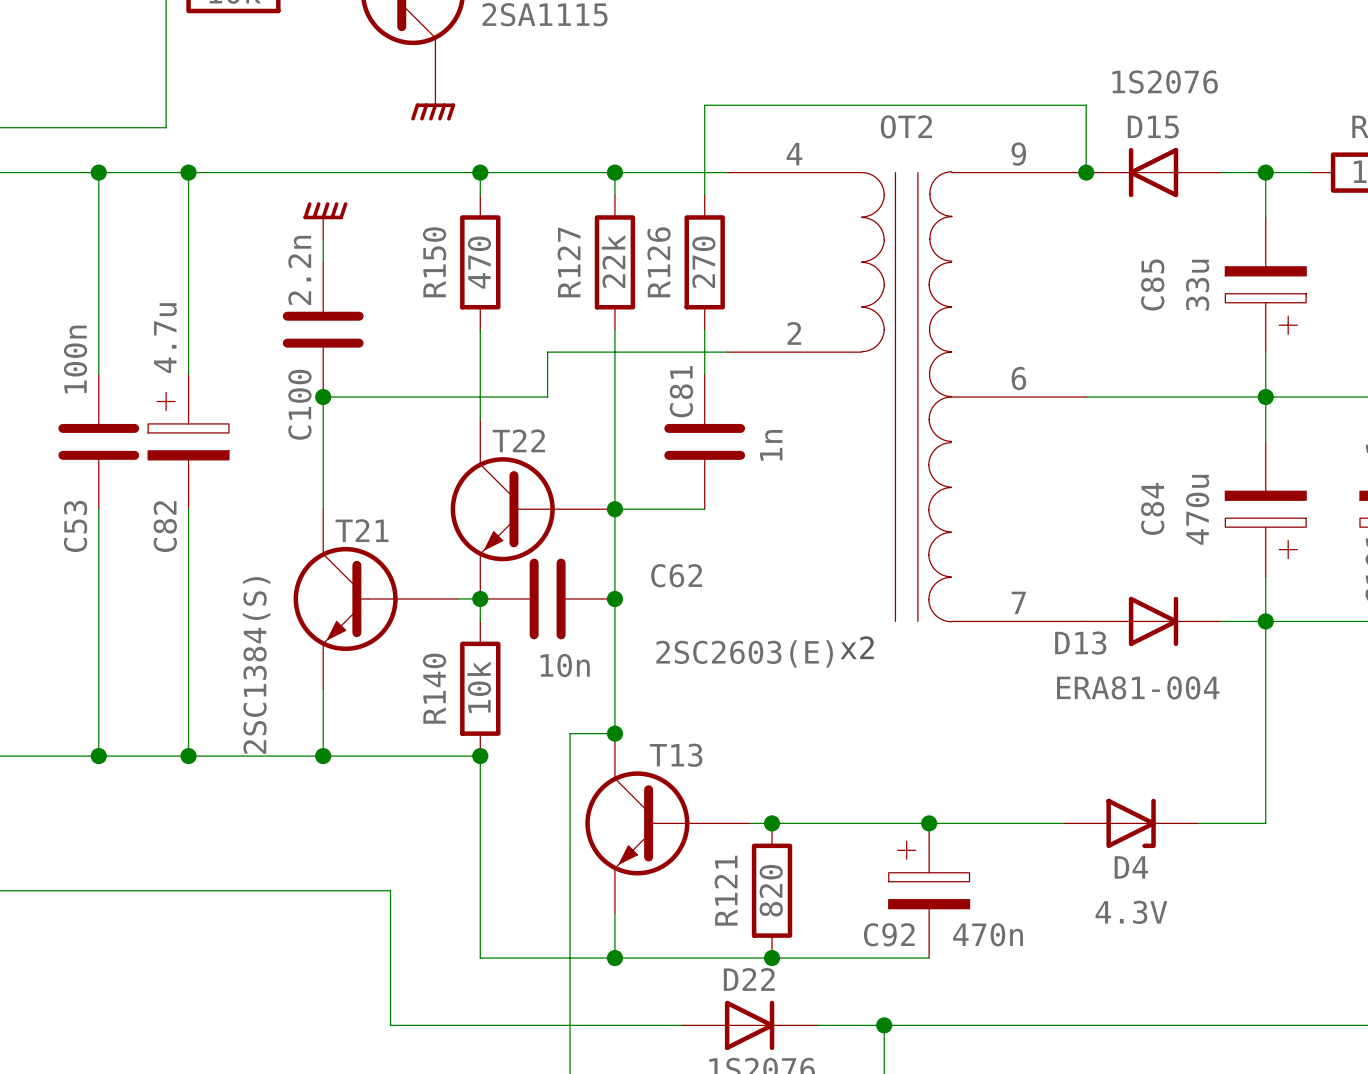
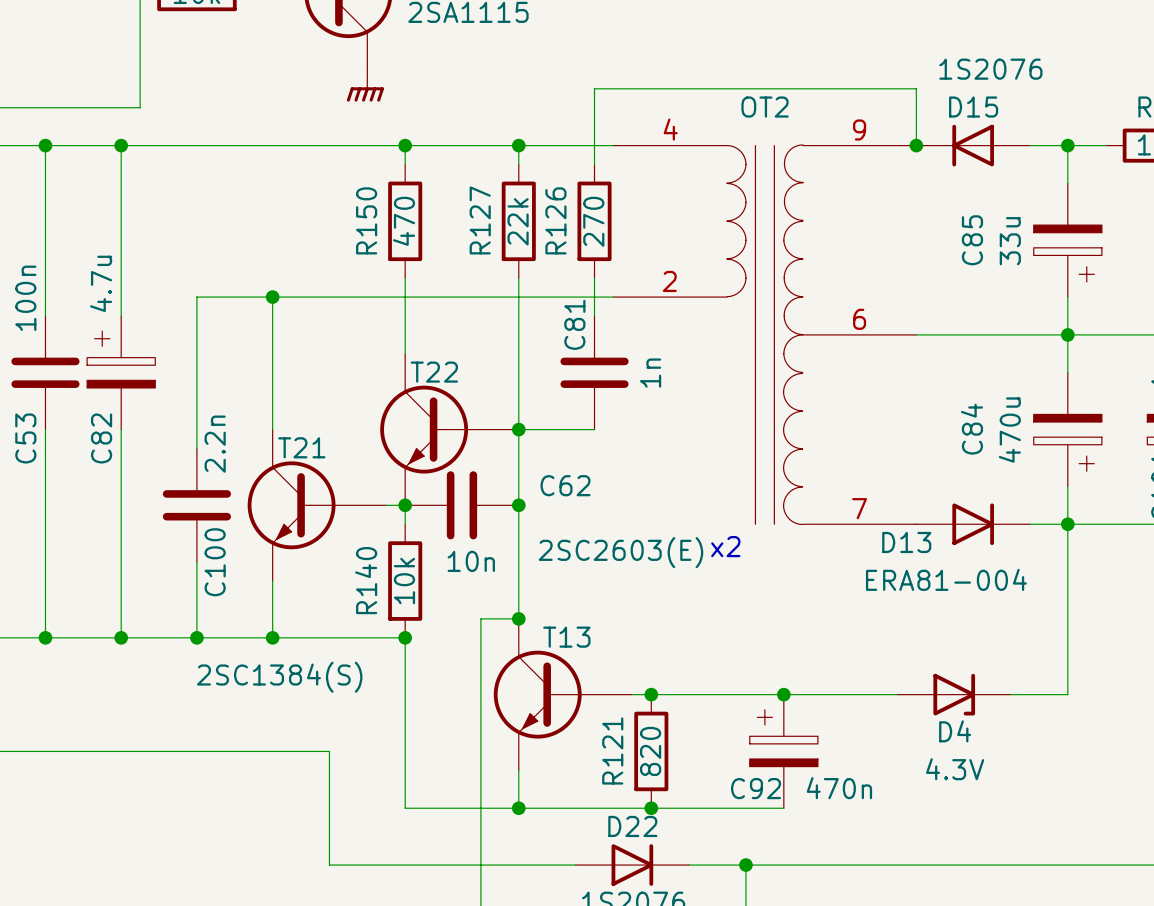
junction: none -> (45, 145)
wire: (98, 172) (98, 374) -> (45, 145) (45, 315)
junction: (98, 172) -> none
junction: none -> (121, 145)
wire: (188, 172) (188, 374) -> (121, 145) (121, 315)
junction: (188, 172) -> none
power symbol: (325, 221) -> none
wire: (323, 239) (323, 262) -> none
C100 value position: 2.2n (299, 270) -> 2.2n (215, 444)
C100 position: (323, 329) -> (196, 505)
wire: (547, 352) (547, 397) (323, 397) -> (461, 297) (196, 297) (196, 448)
junction position: (323, 397) -> (272, 297)
C100 name position: C100 (299, 404) -> C100 (215, 562)
C53 position: (98, 441) -> (45, 372)
C82 position: (188, 441) -> (121, 372)
wire: (98, 509) (98, 756) -> (45, 429) (45, 637)
wire: (188, 509) (188, 756) -> (121, 429) (121, 637)
T21 value rotation: 0° (256, 665) -> 90° clockwise (279, 677)
wire: none -> (196, 562) (196, 637)
junction: none -> (45, 637)
junction: (98, 756) -> none
junction: none -> (121, 637)
junction: (188, 756) -> none
junction: none -> (196, 637)

